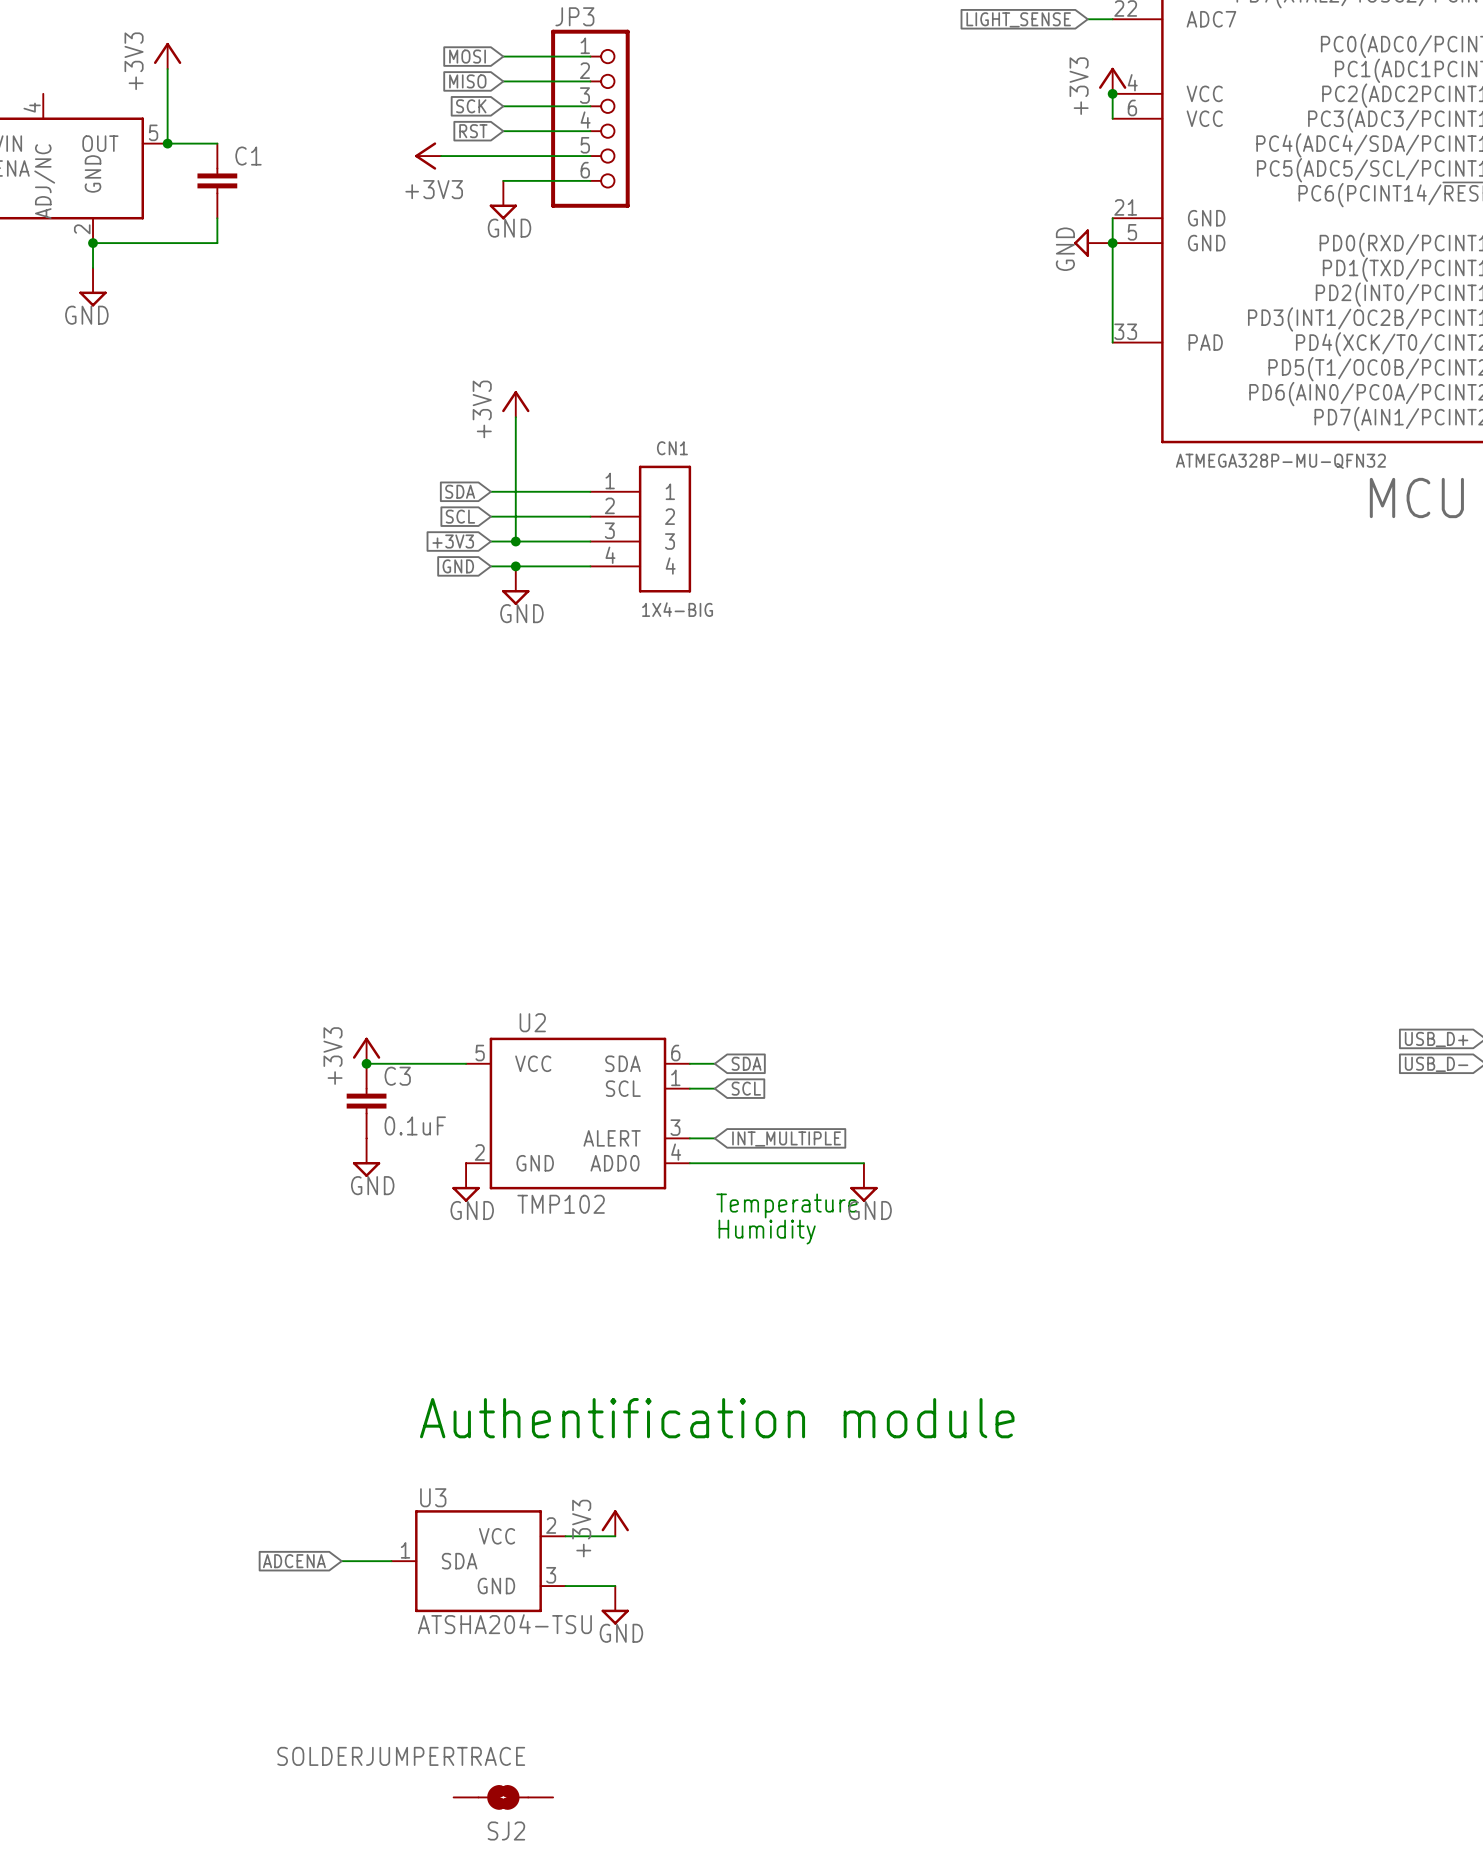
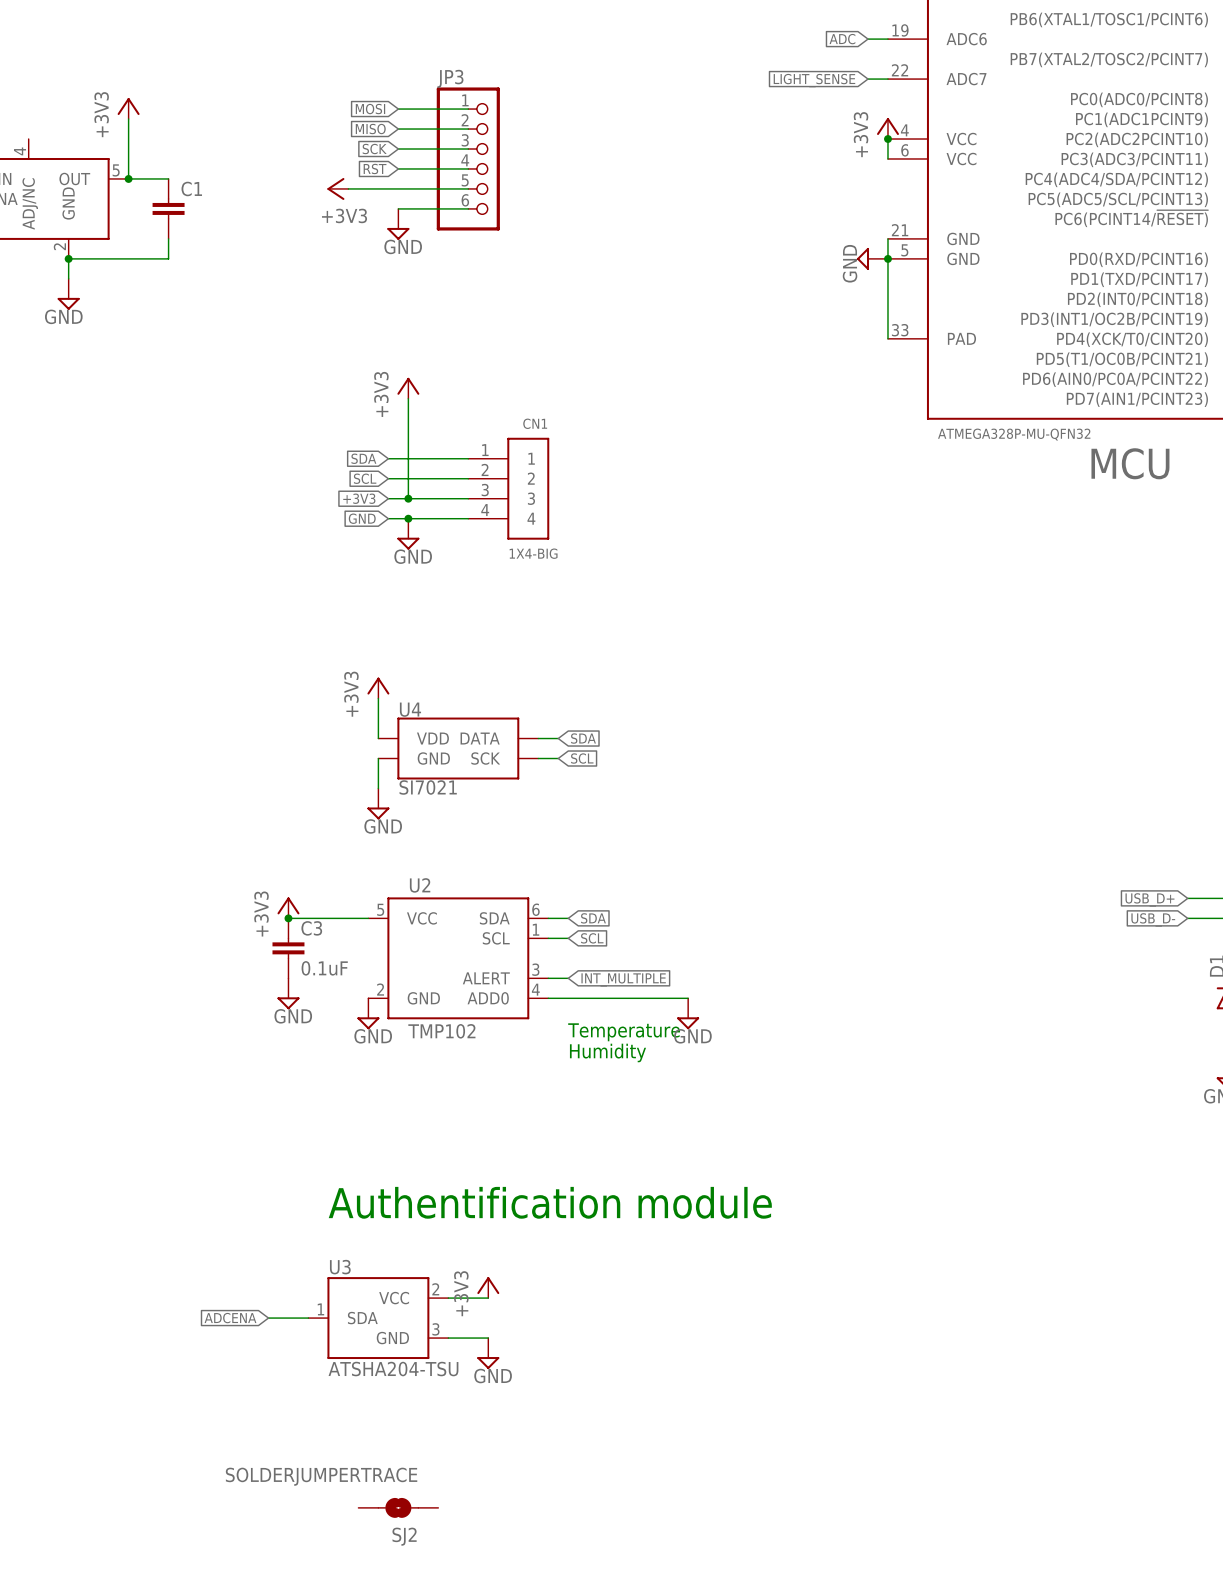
power symbol: none -> +3V3 (378, 688)
wire: none -> (378, 698) (378, 738)
wire: none -> (538, 738) (558, 738)
global label: none -> SDA (583, 738)
U4: none -> SI7021 (458, 748)
wire: none -> (378, 758) (378, 788)
wire: none -> (538, 758) (558, 758)
global label: none -> SCL (582, 758)
power symbol: none -> GND (378, 803)

